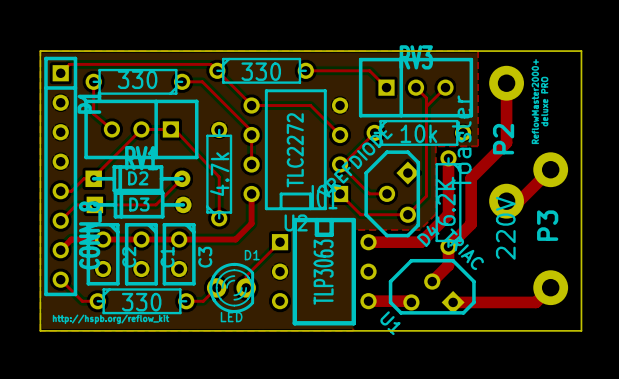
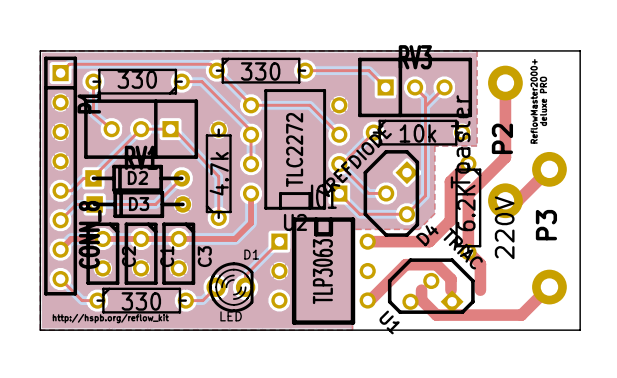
top track: (506, 142) (471, 178) (471, 224) (448, 246) (448, 265) (432, 281) -> (505, 142) (505, 157) (468, 194) (468, 252) (480, 264) (480, 290)
top track: (448, 158) (448, 214) (421, 242) -> (468, 163) (450, 181) (450, 220) (429, 241) (420, 241)
part position: (448, 202) -> (468, 207)
top track: (370, 301) (411, 302) -> (370, 300) (405, 264) (436, 264) (450, 279) (450, 290)
top track: (453, 302) (535, 302) -> (421, 290) (421, 300) (436, 315) (521, 315) (534, 301)

